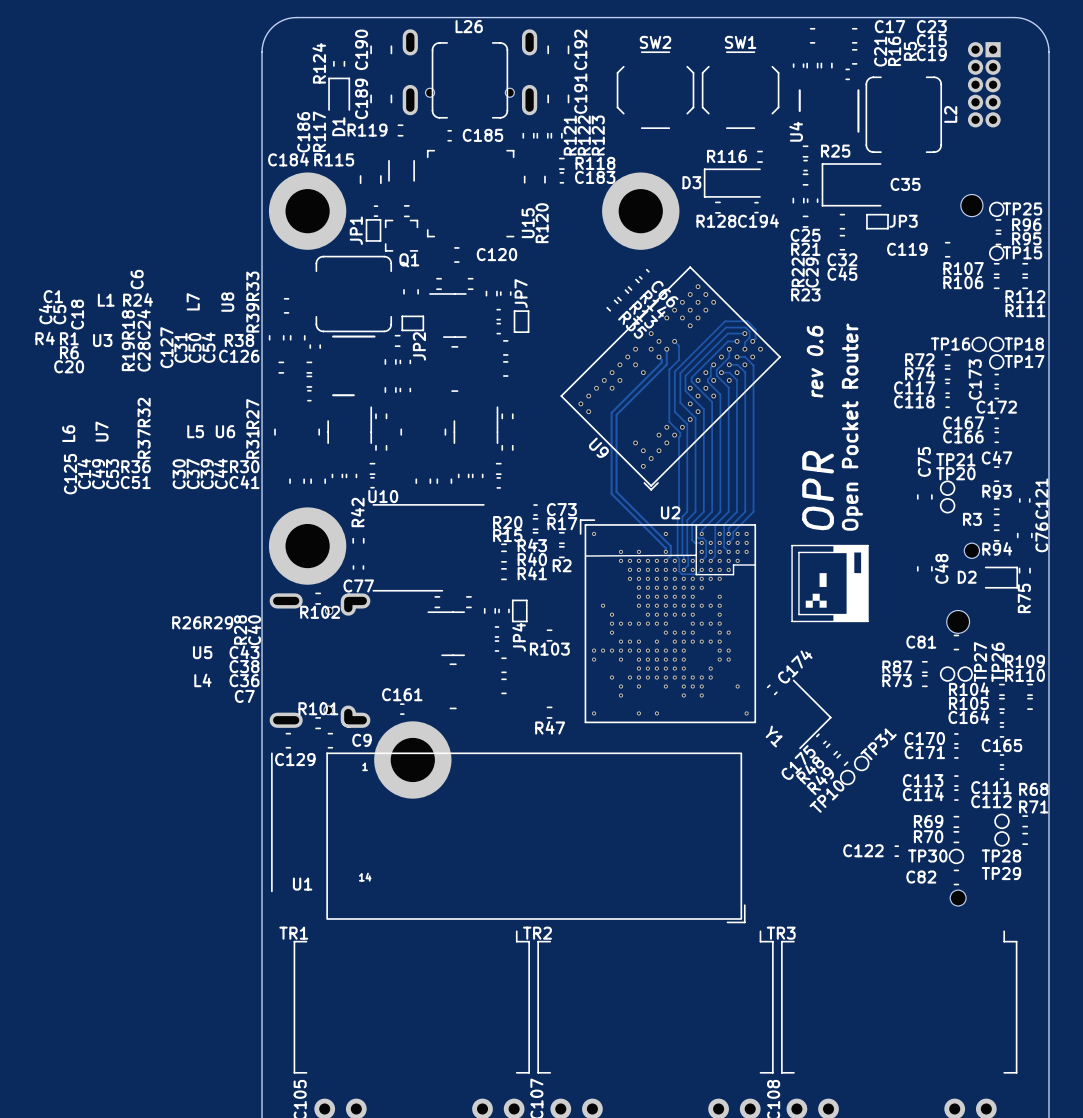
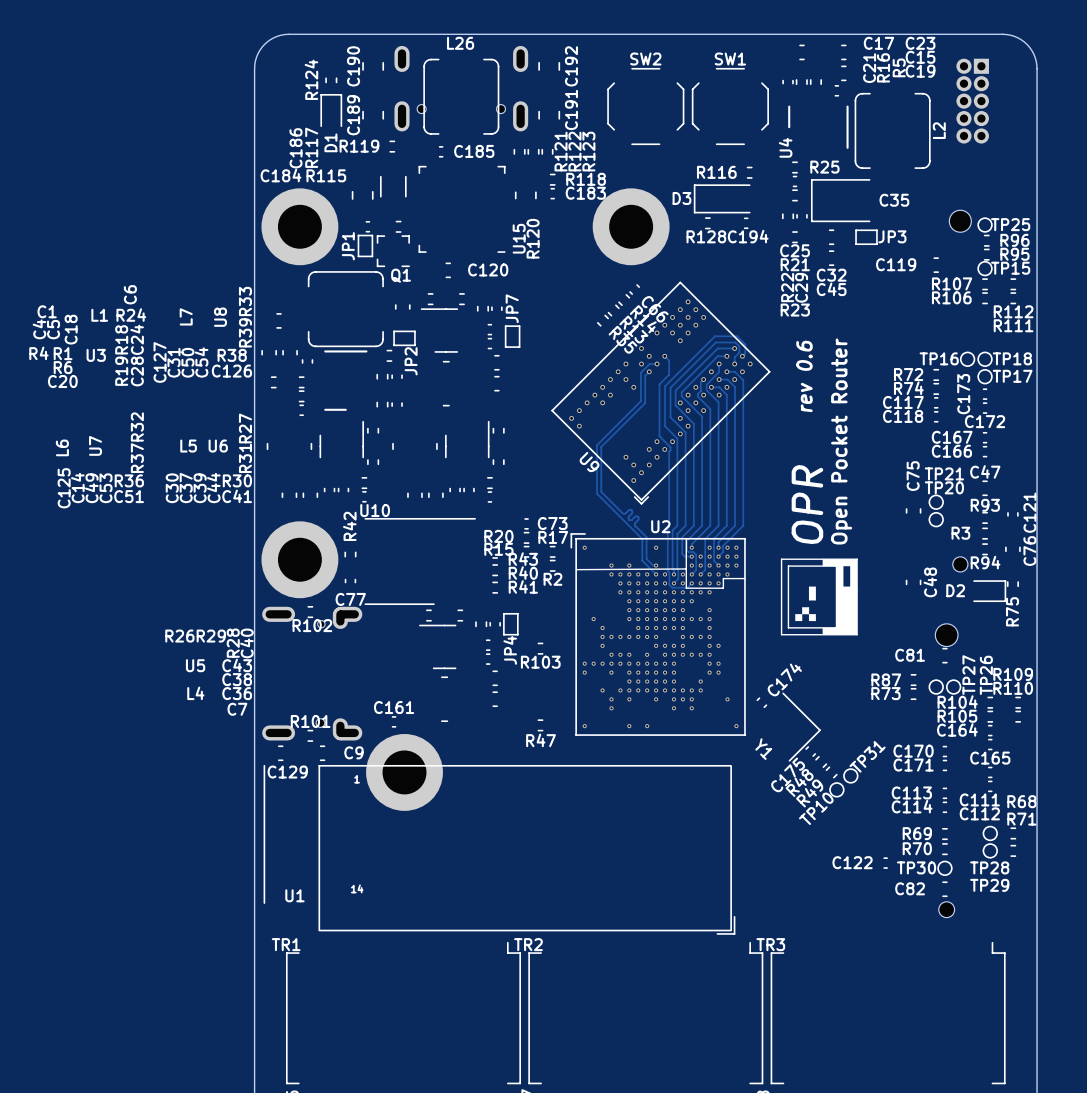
track: (666, 349) (666, 364) (616, 414) (616, 491) (670, 546) (670, 555) (665, 560) -> (657, 364) (649, 364) (640, 372) (640, 401) (597, 445) (597, 493) (642, 538) (642, 560) (656, 574)
track: (658, 357) (661, 362) (611, 412) (611, 493) (665, 548) (665, 551) -> (649, 371) (645, 375) (645, 403) (601, 446) (601, 491) (623, 513) (631, 510) (632, 513) (628, 517) (629, 519) (638, 517) (634, 524) (646, 537) (646, 558) (653, 565) (656, 565)

